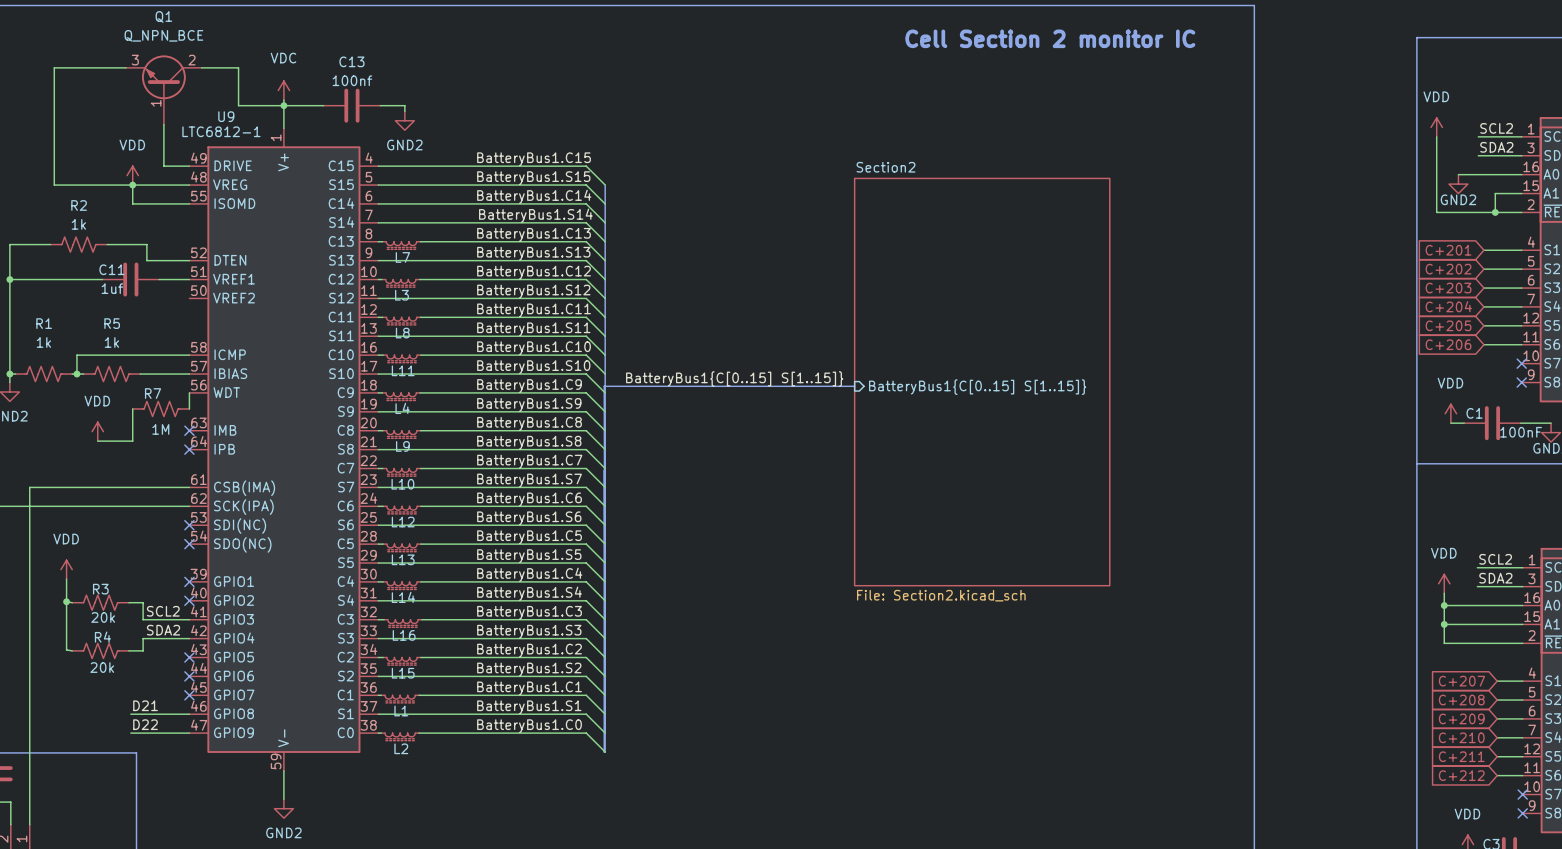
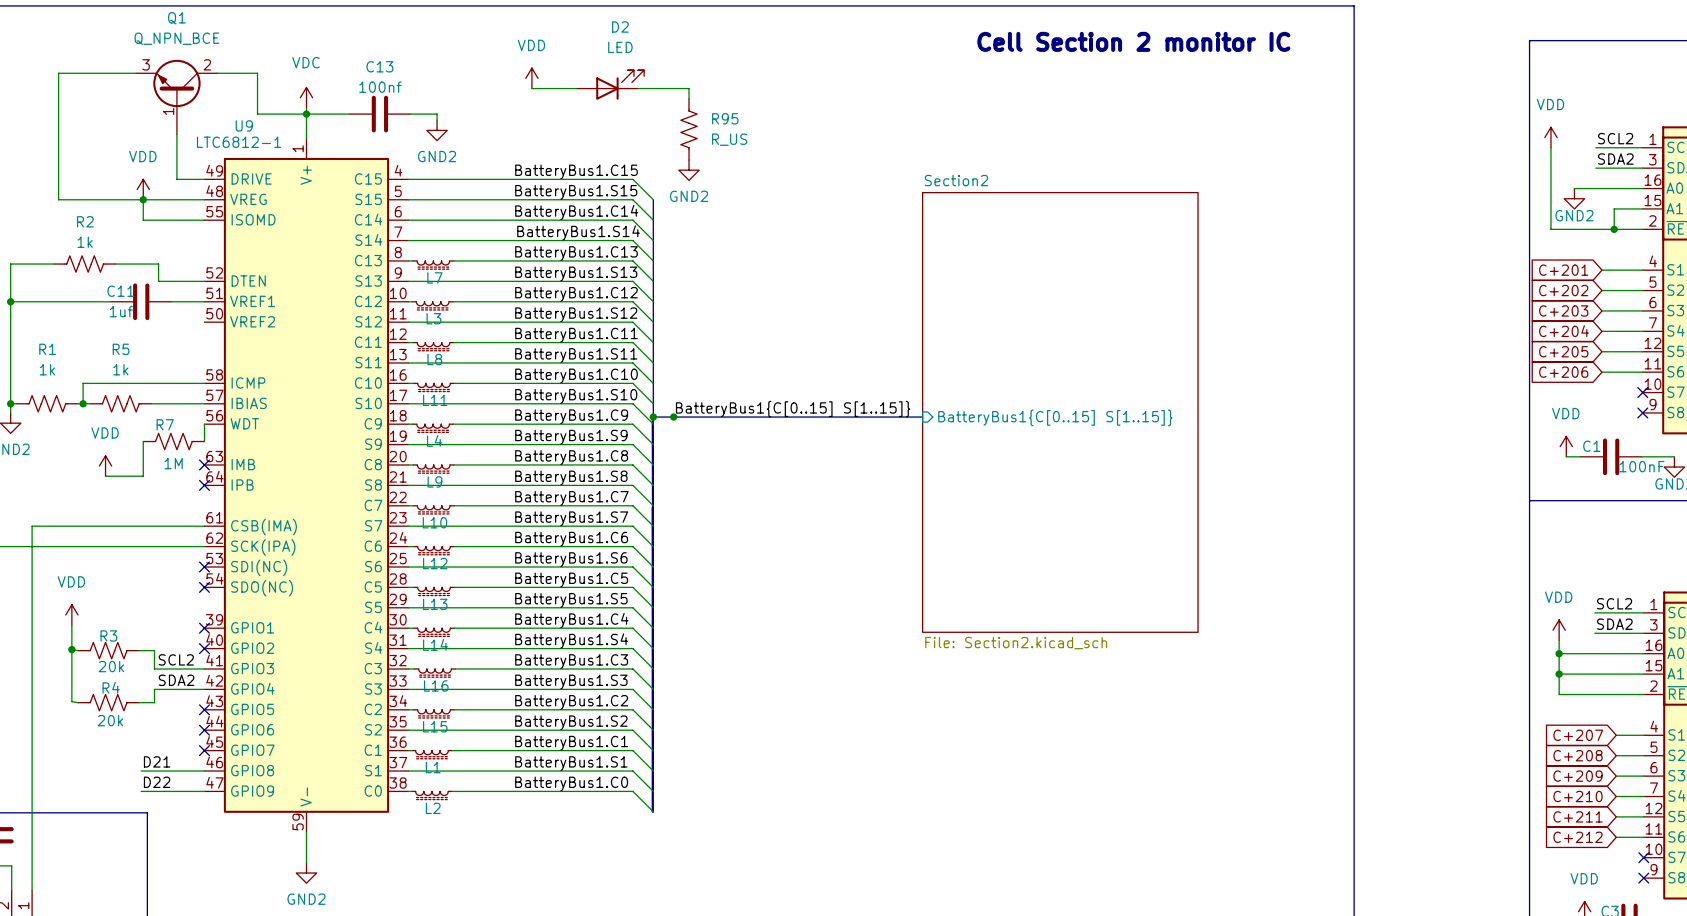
power symbol: none -> VDD (531, 78)
D2: none -> LED (610, 85)
wire: none -> (531, 88) (576, 88)
wire: none -> (638, 88) (689, 88) (689, 98)
R95: none -> R_US (689, 129)
power symbol: none -> GND2 (689, 170)
junction: none -> (653, 417)
junction: none -> (673, 417)

